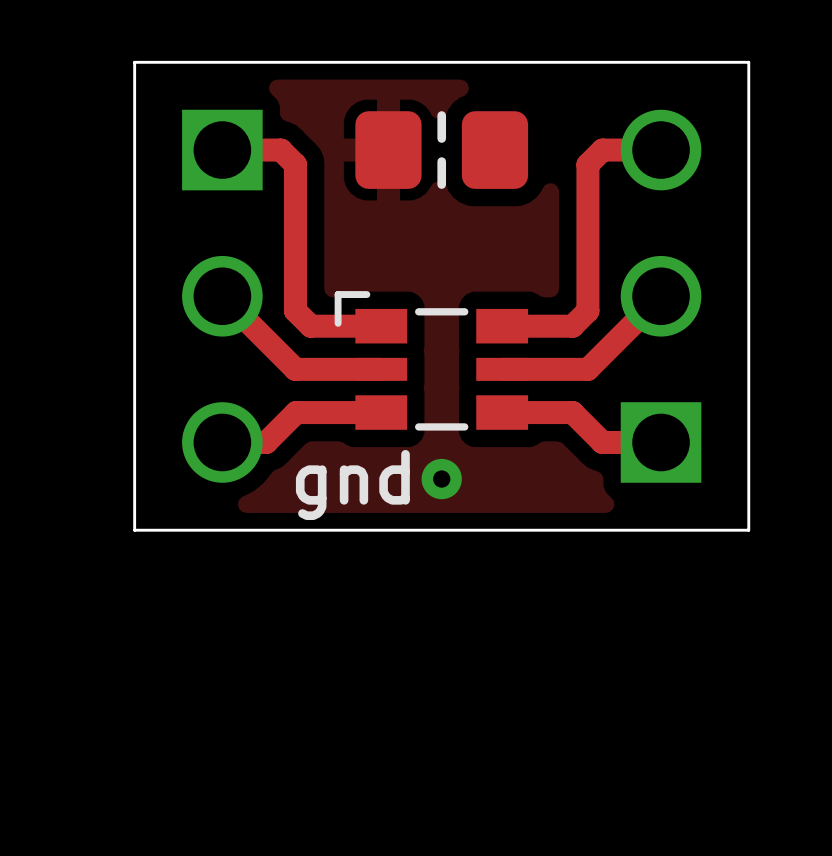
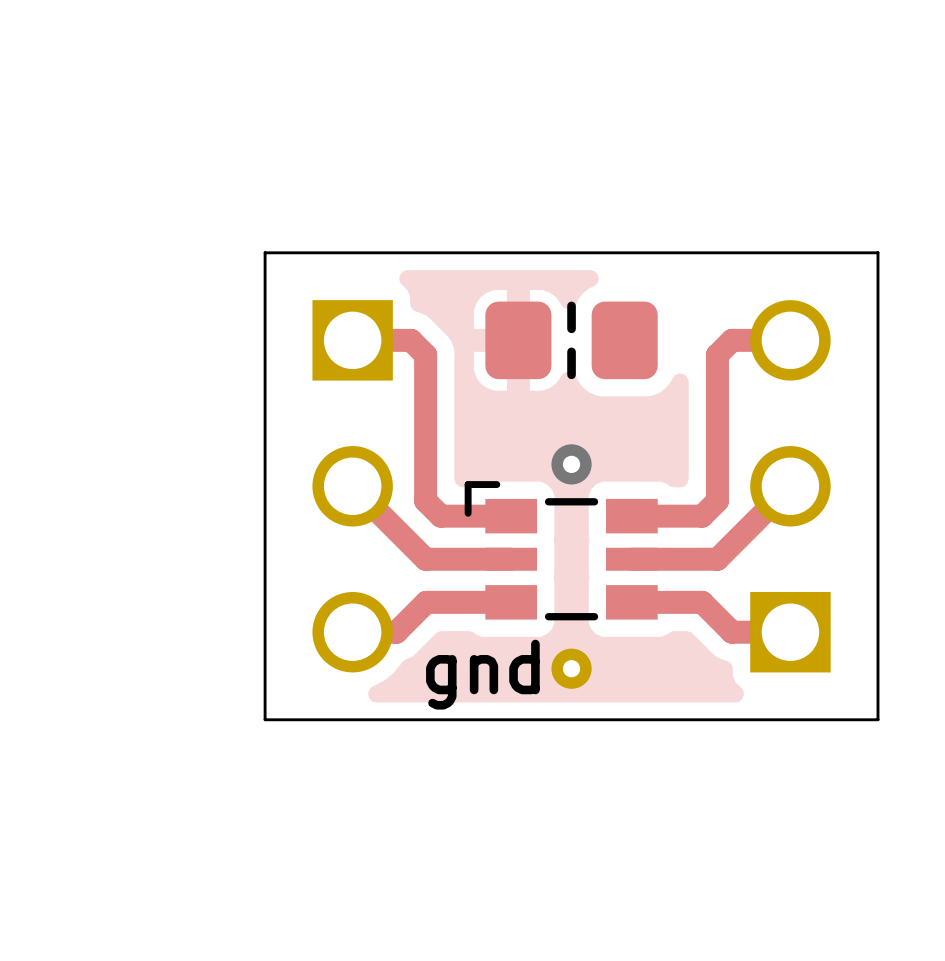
via: none -> (571, 464)

